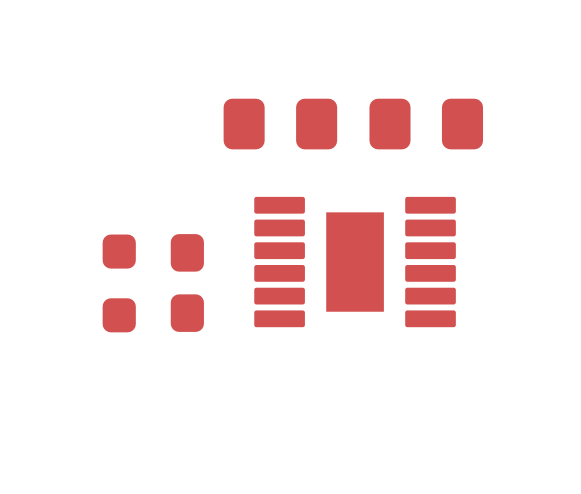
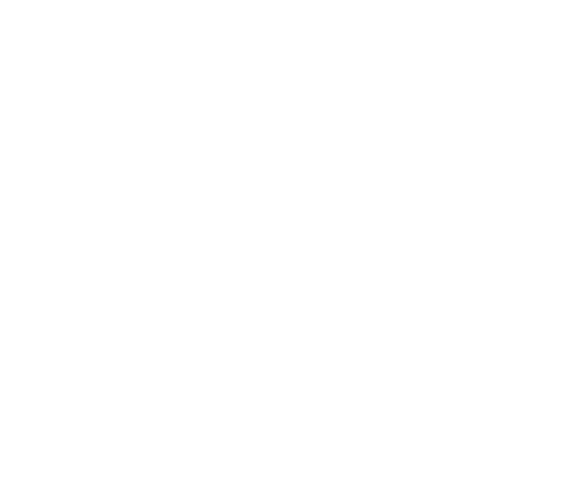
part: (280, 124) -> none
part: (426, 124) -> none
part: (355, 262) -> none
part: (119, 283) -> none
part: (187, 283) -> none

